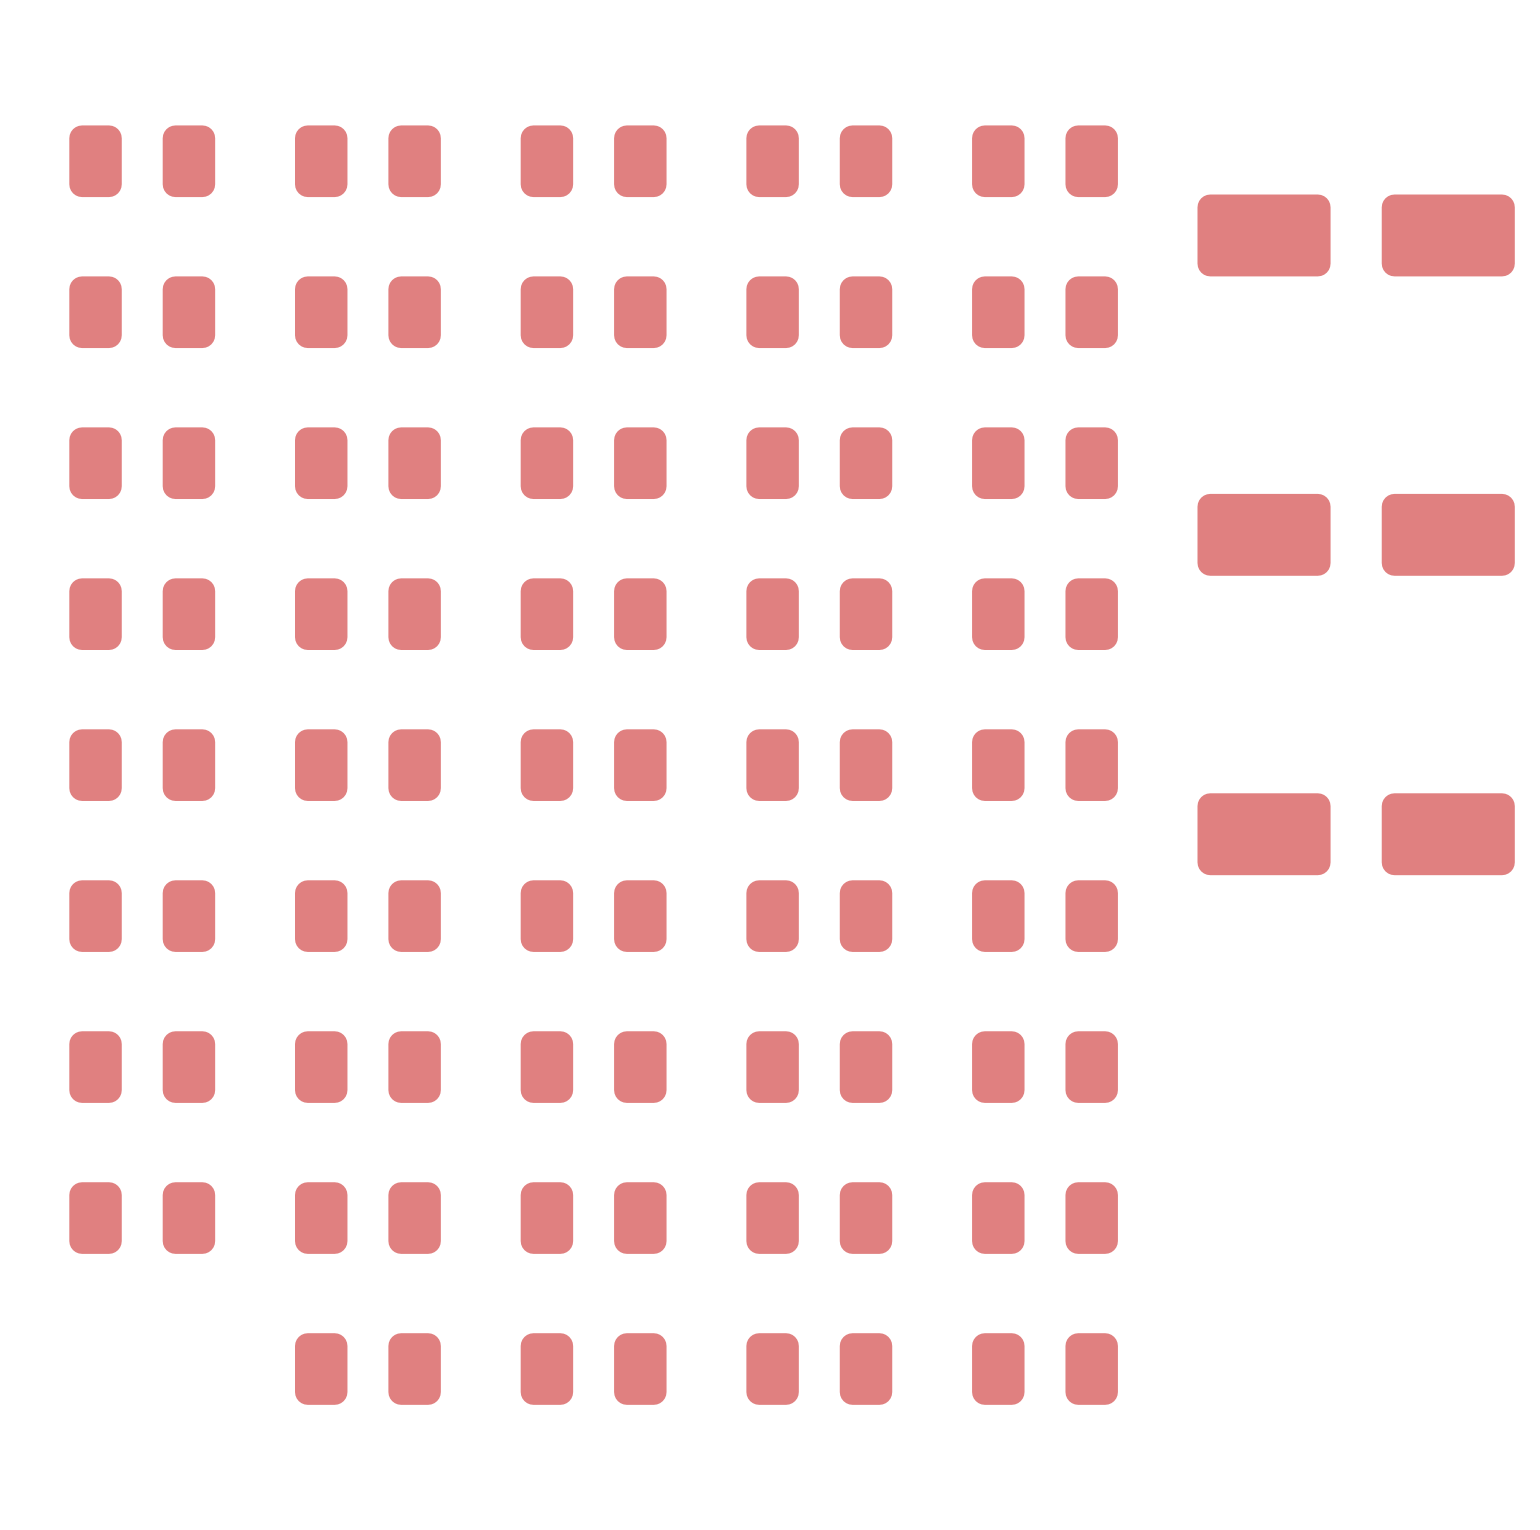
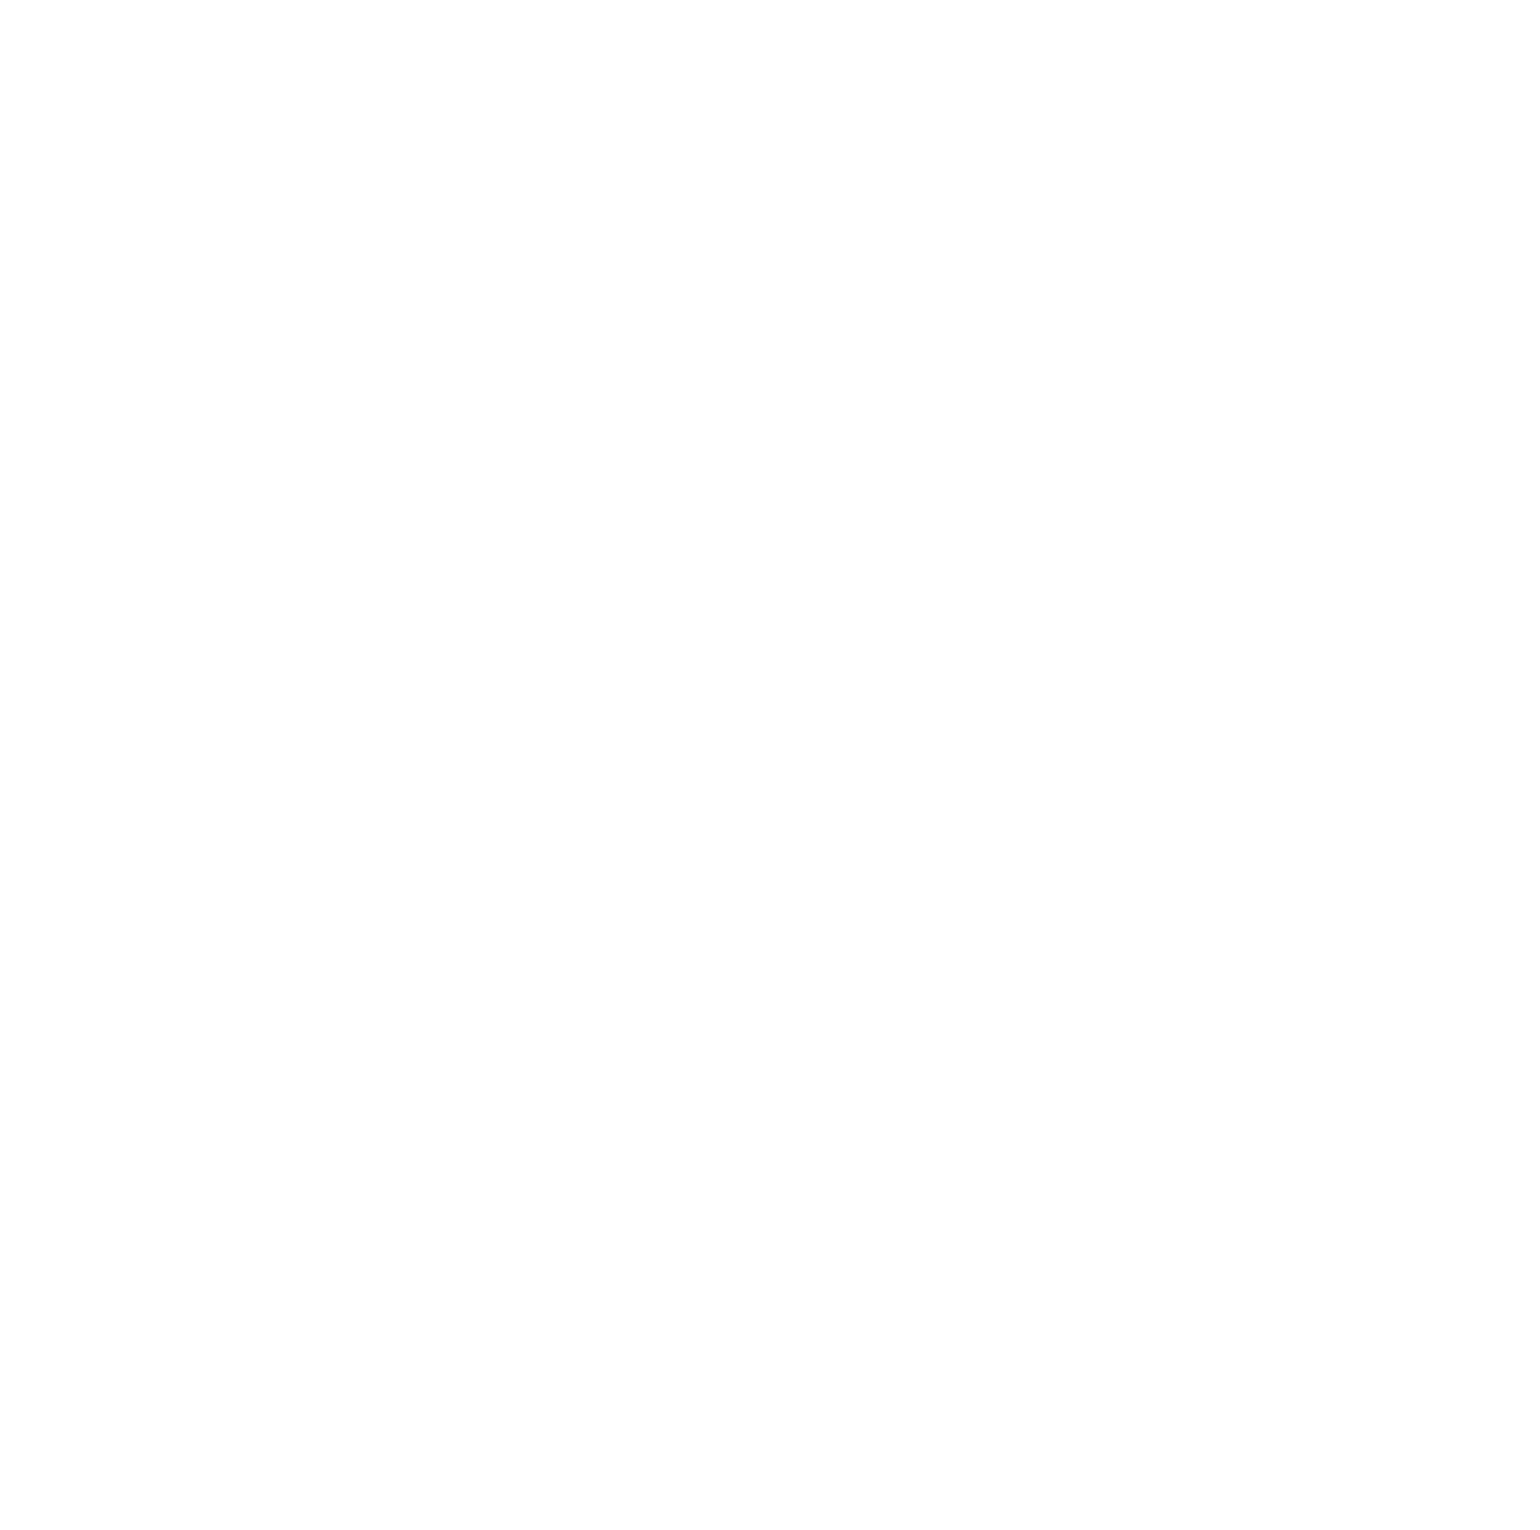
part: (142, 161) -> none
part: (367, 161) -> none
part: (593, 161) -> none
part: (819, 161) -> none
part: (1044, 161) -> none
part: (1356, 235) -> none
part: (142, 312) -> none
part: (367, 312) -> none
part: (593, 312) -> none
part: (819, 312) -> none
part: (1044, 312) -> none
part: (142, 463) -> none
part: (367, 463) -> none
part: (593, 463) -> none
part: (819, 463) -> none
part: (1044, 463) -> none
part: (1356, 534) -> none
part: (142, 614) -> none
part: (367, 614) -> none
part: (593, 614) -> none
part: (819, 614) -> none
part: (1044, 614) -> none
part: (142, 765) -> none
part: (367, 765) -> none
part: (593, 765) -> none
part: (819, 765) -> none
part: (1044, 765) -> none
part: (1356, 834) -> none
part: (142, 916) -> none
part: (367, 916) -> none
part: (593, 916) -> none
part: (819, 916) -> none
part: (1044, 916) -> none
part: (142, 1067) -> none
part: (367, 1067) -> none
part: (593, 1067) -> none
part: (819, 1067) -> none
part: (1044, 1067) -> none
part: (142, 1218) -> none
part: (367, 1218) -> none
part: (593, 1218) -> none
part: (819, 1218) -> none
part: (1044, 1218) -> none
part: (367, 1369) -> none
part: (593, 1369) -> none
part: (819, 1369) -> none
part: (1044, 1369) -> none

